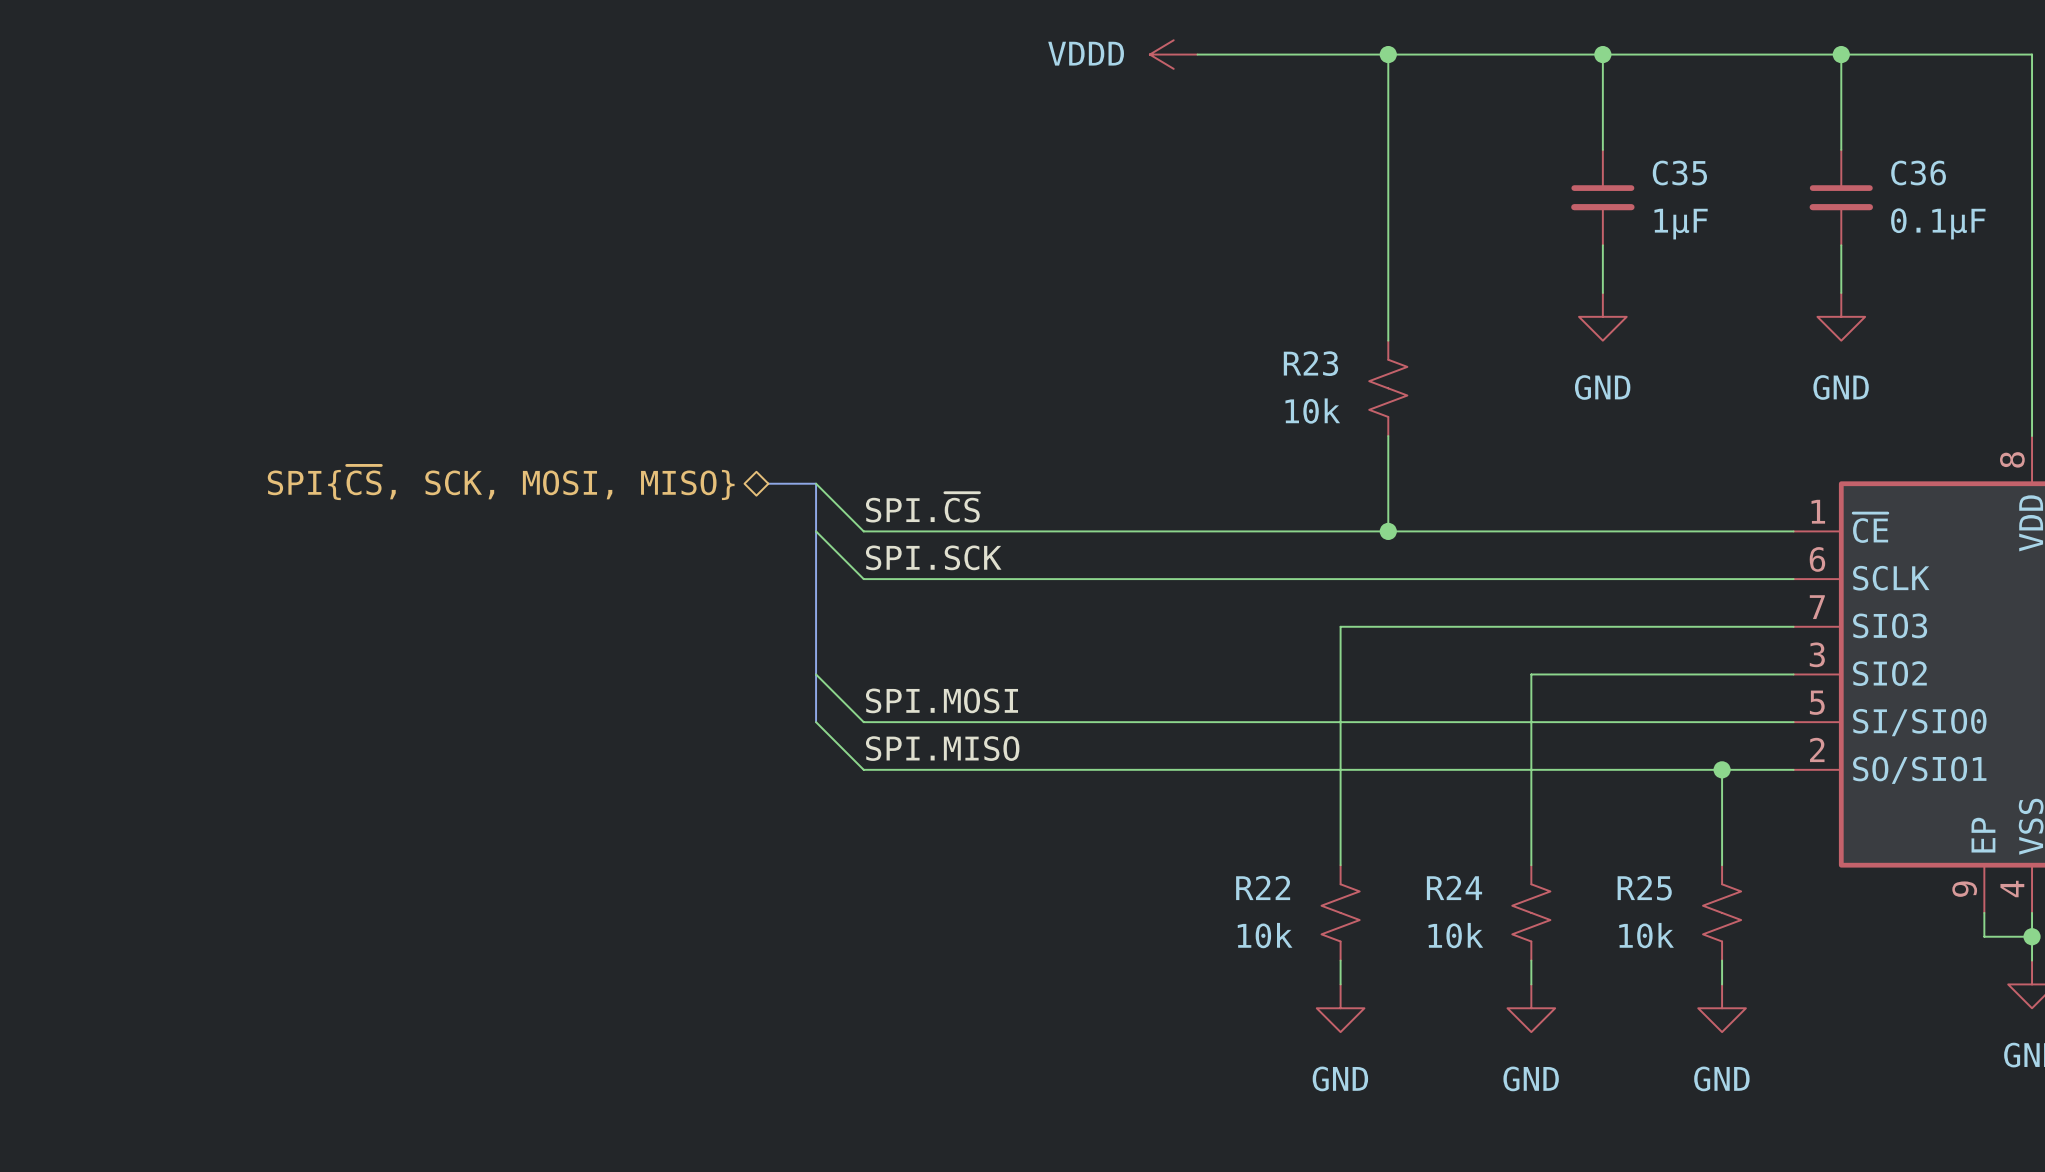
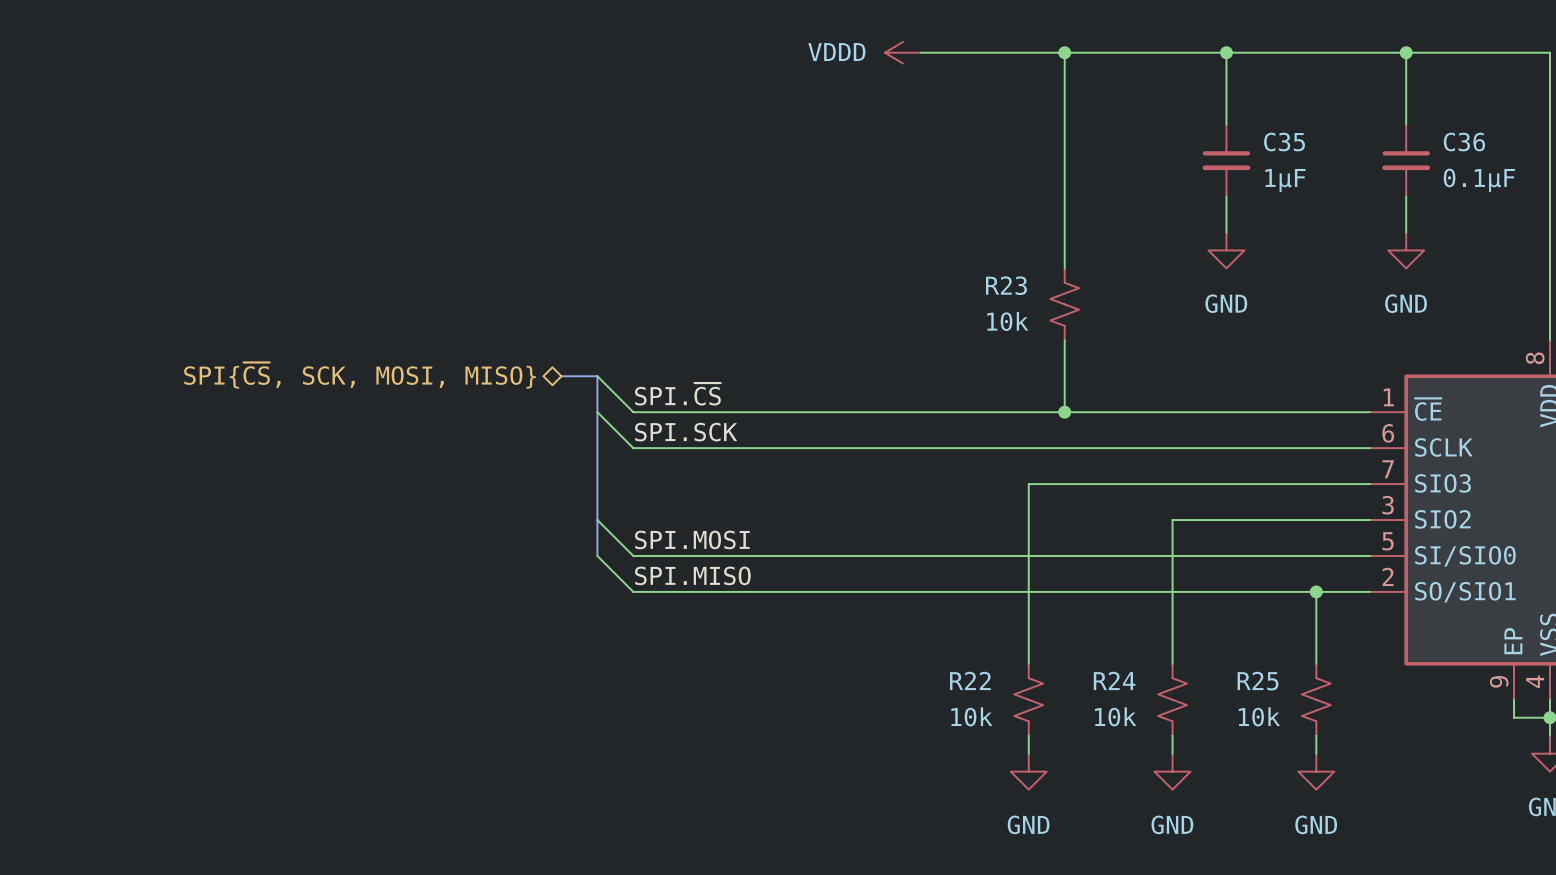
hierarchical label position: SPI{~{CS}, SCK, MOSI, MISO} (501, 482) -> SPI{~{CS}, SCK, MOSI, MISO} (360, 375)
bus: (768, 483) (816, 483) (816, 722) -> (561, 376) (597, 376) (597, 555)
wire: (816, 483) (863, 531) -> (597, 376) (633, 412) (669, 412)
label position: SPI.~{CS} (922, 507) -> SPI.~{CS} (677, 394)
wire: (816, 531) (863, 579) -> (597, 412) (633, 448) (669, 448)
label position: SPI.SCK (933, 557) -> SPI.SCK (686, 432)
wire: (816, 674) (863, 722) -> (597, 520) (633, 555) (669, 555)
label position: SPI.MOSI (941, 700) -> SPI.MOSI (692, 539)
wire: (816, 722) (863, 769) -> (597, 555) (633, 591) (669, 591)
label position: SPI.MISO (942, 748) -> SPI.MISO (692, 575)

